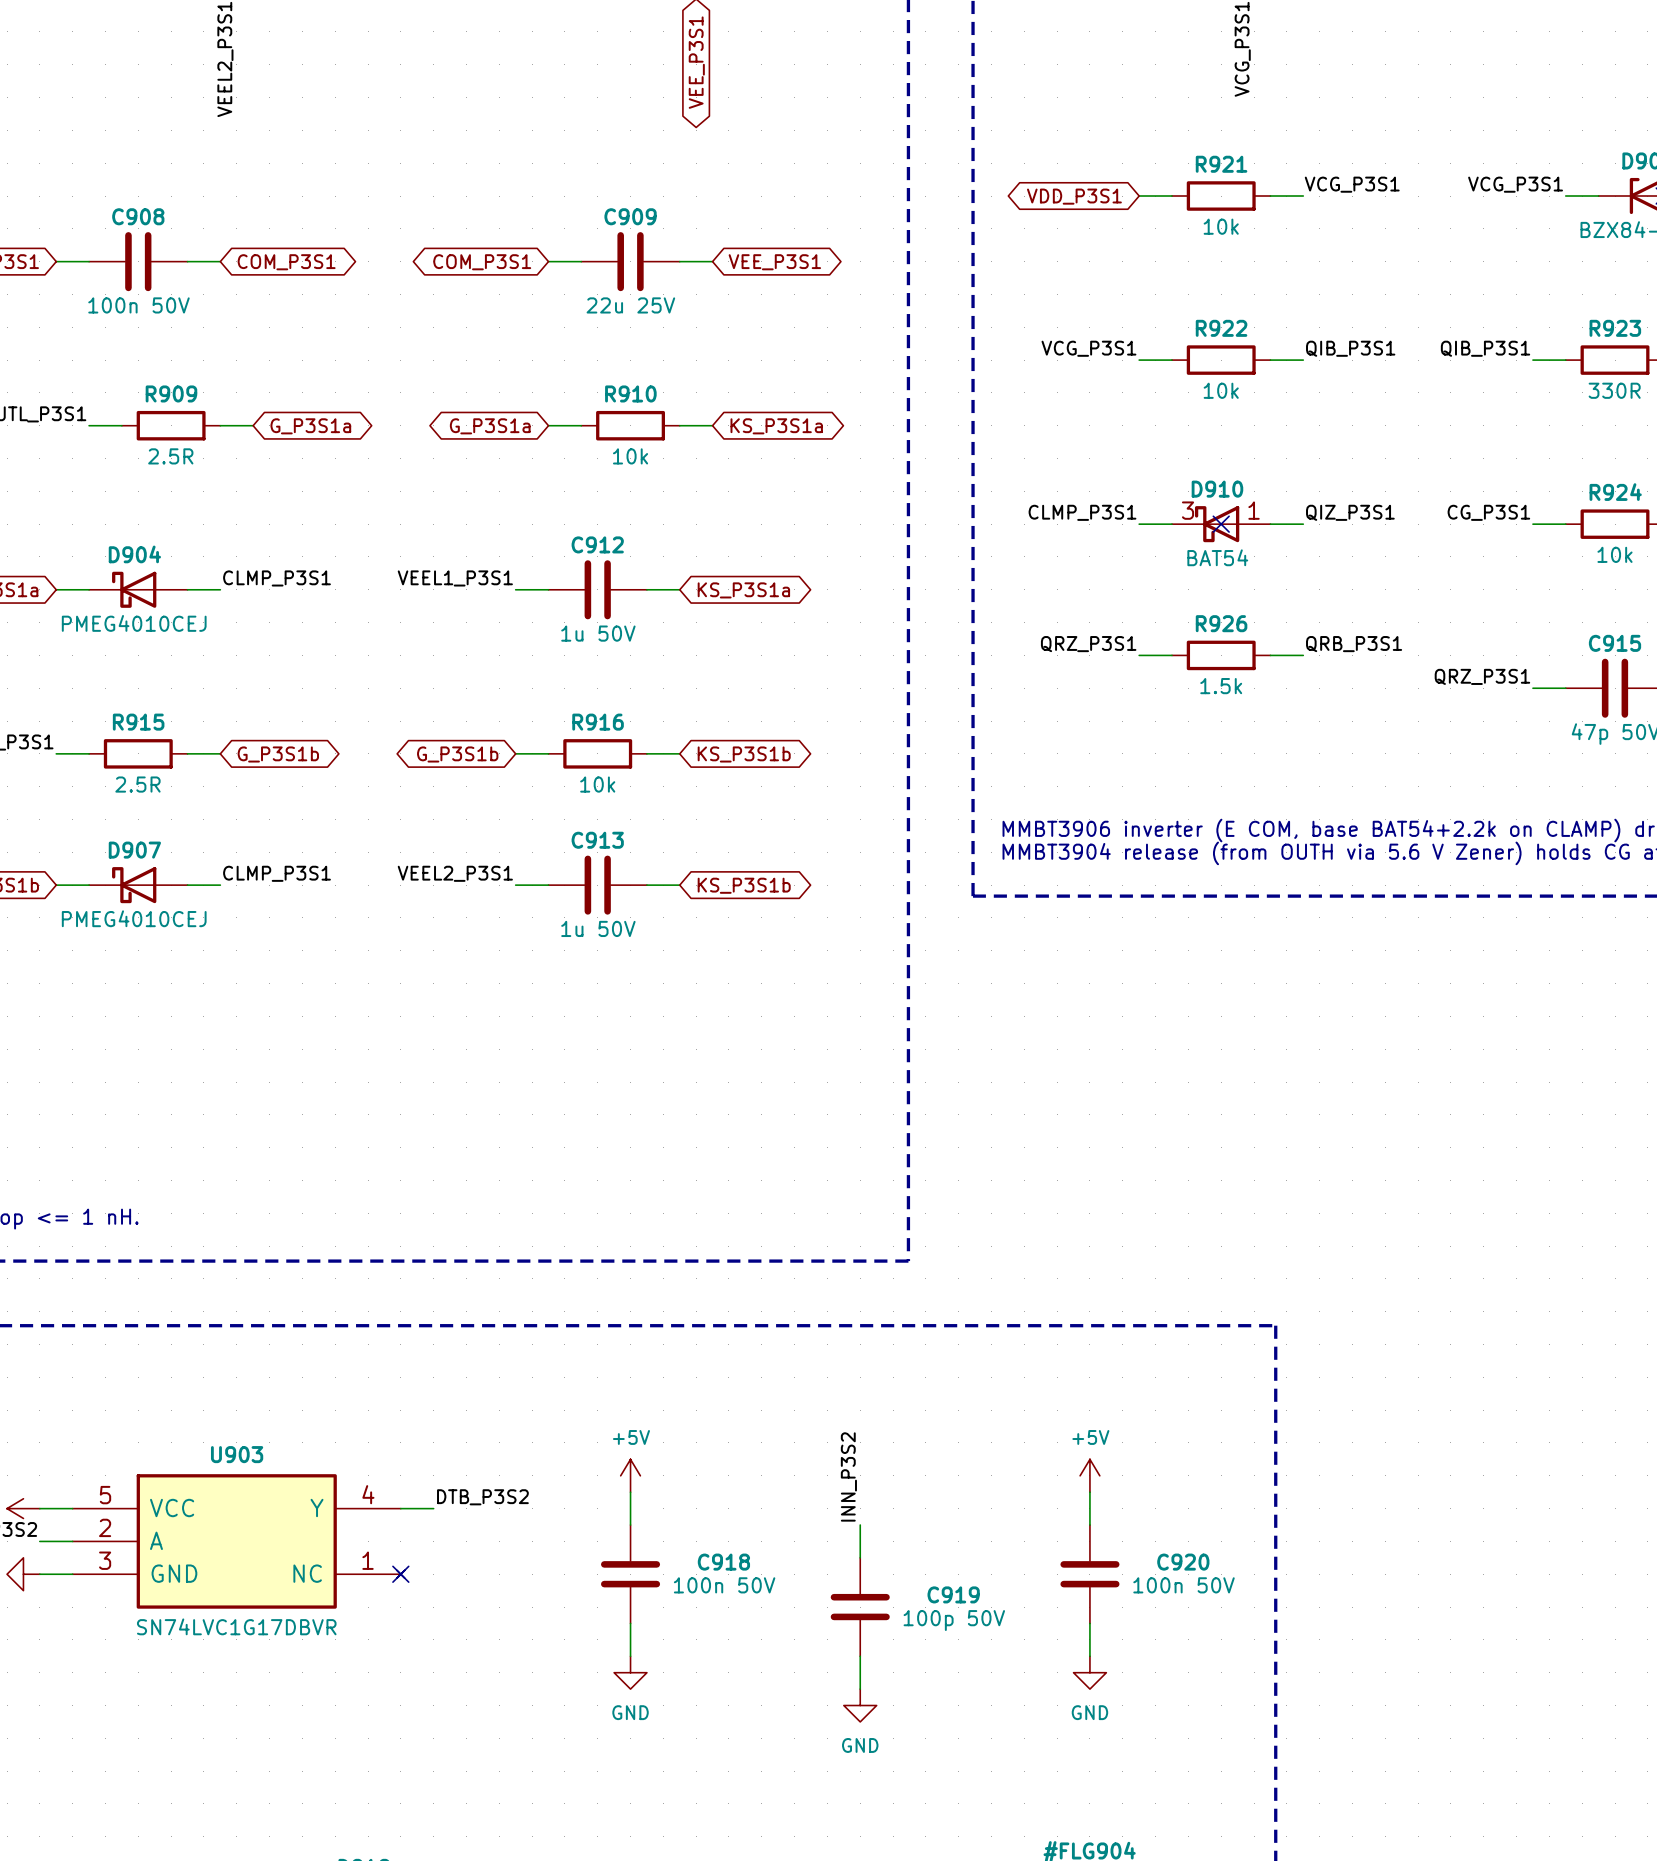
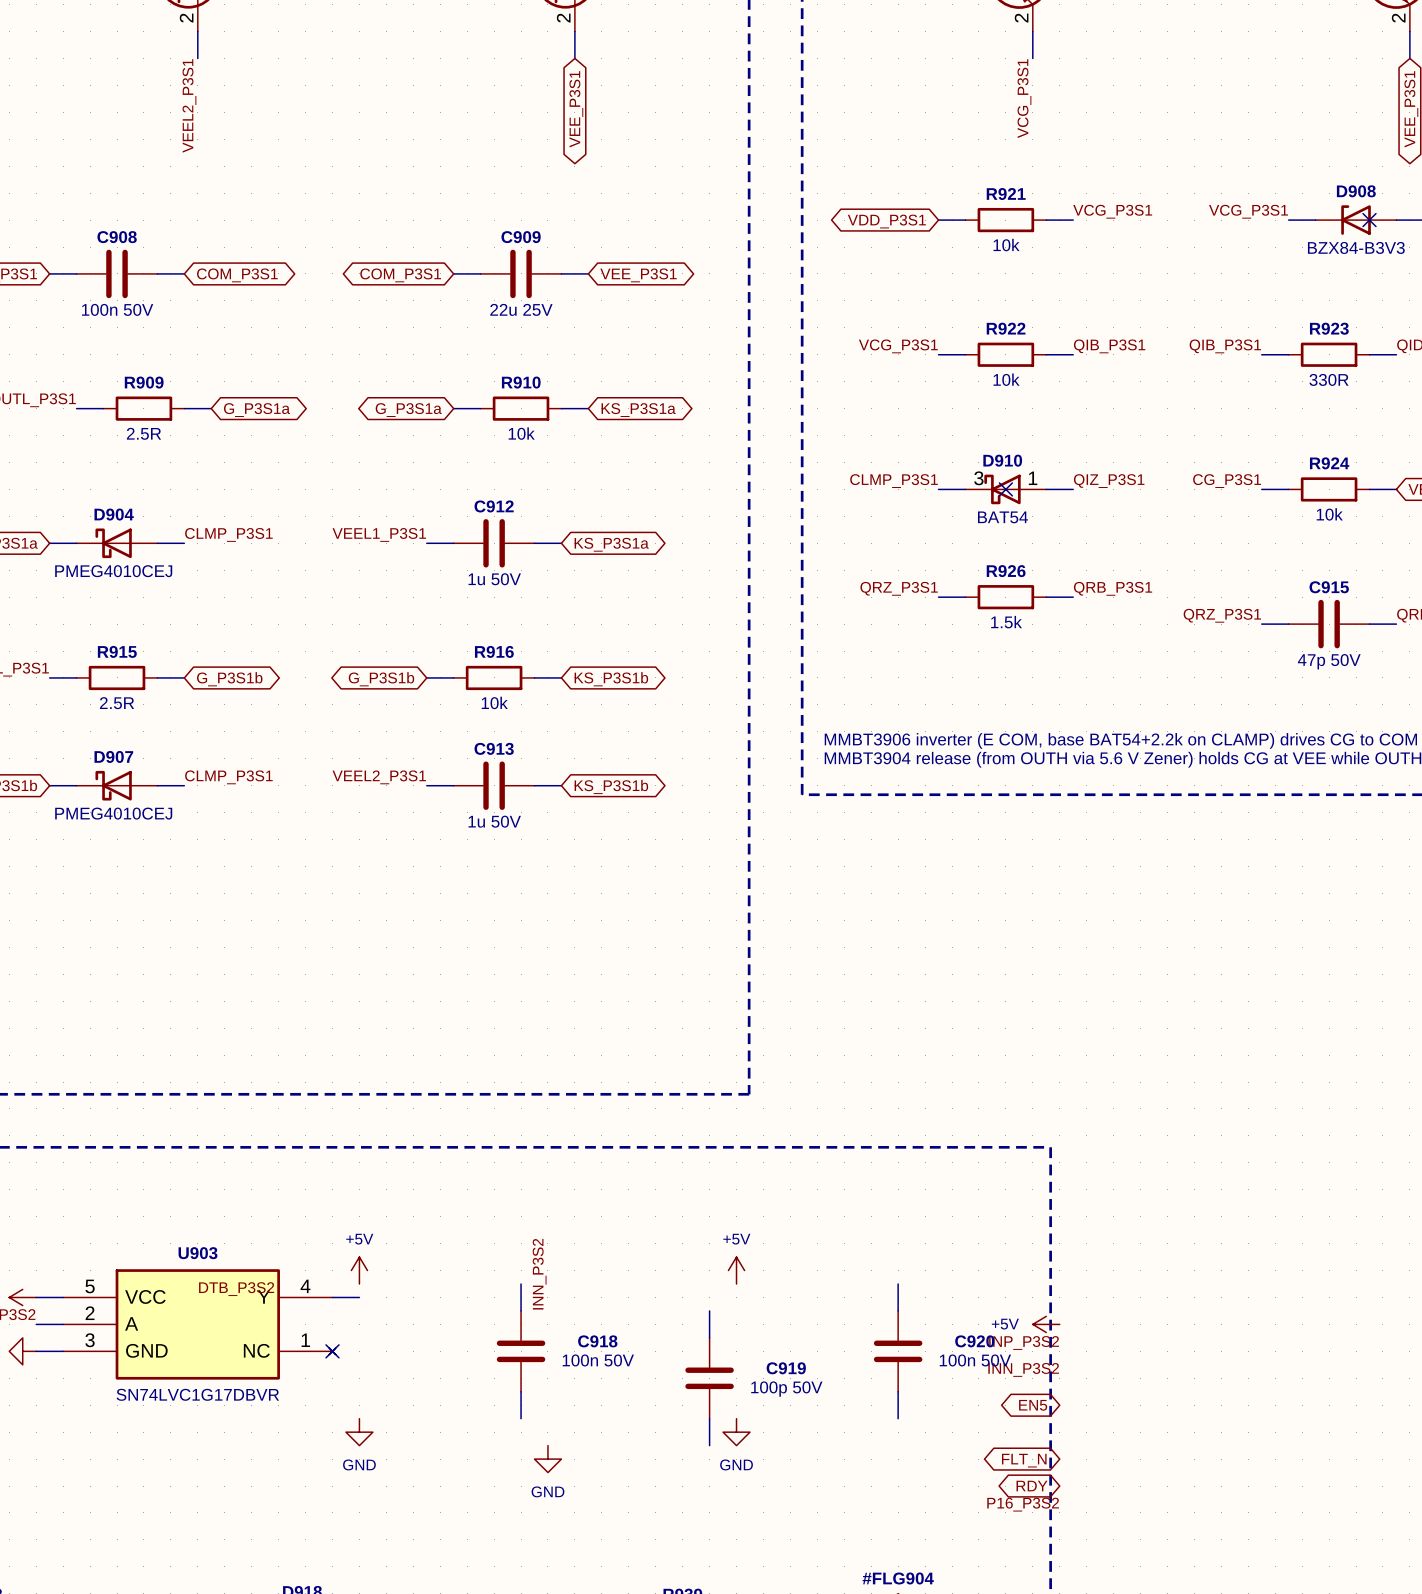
power symbol: none -> +5V (359, 1270)
power symbol: +5V (630, 1475) -> none
power symbol: none -> +5V (736, 1270)
power symbol: +5V (1089, 1475) -> none
label position: INN_P3S2 (848, 1476) -> INN_P3S2 (539, 1274)
label position: DTB_P3S2 (482, 1497) -> DTB_P3S2 (236, 1289)
power symbol: none -> +5V (1046, 1324)
label: none -> INP_P3S2 (1024, 1343)
label: none -> INN_P3S2 (1023, 1369)
global label: none -> EN5 (1033, 1405)
power symbol: none -> GND (359, 1432)
power symbol position: GND (630, 1672) -> GND (547, 1459)
power symbol: GND (1089, 1672) -> none
power symbol position: GND (860, 1705) -> GND (736, 1432)
global label: none -> FLT_N (1024, 1460)
global label: none -> RDY (1032, 1486)
label: none -> P16_P3S2 (1023, 1504)

